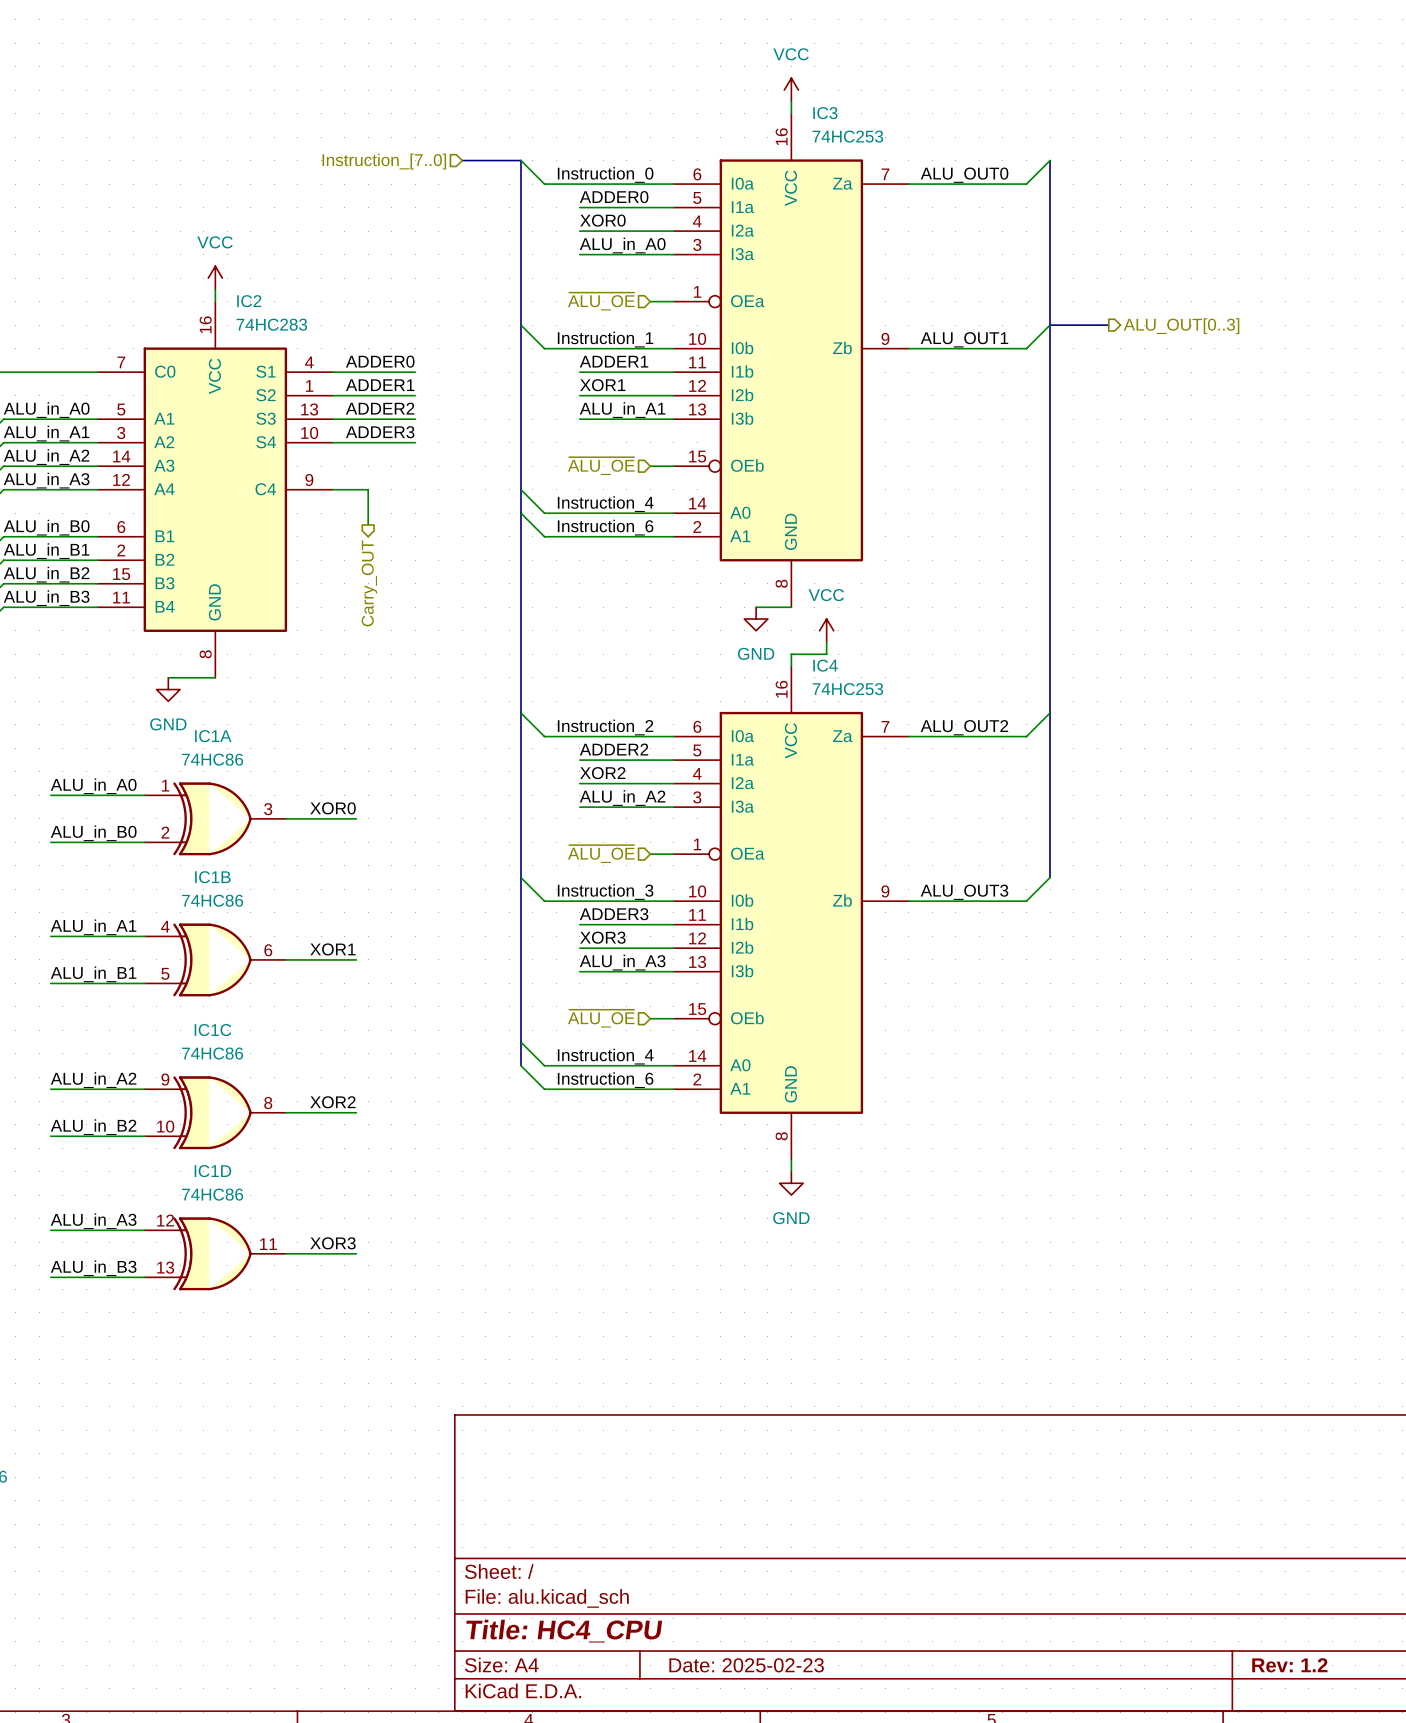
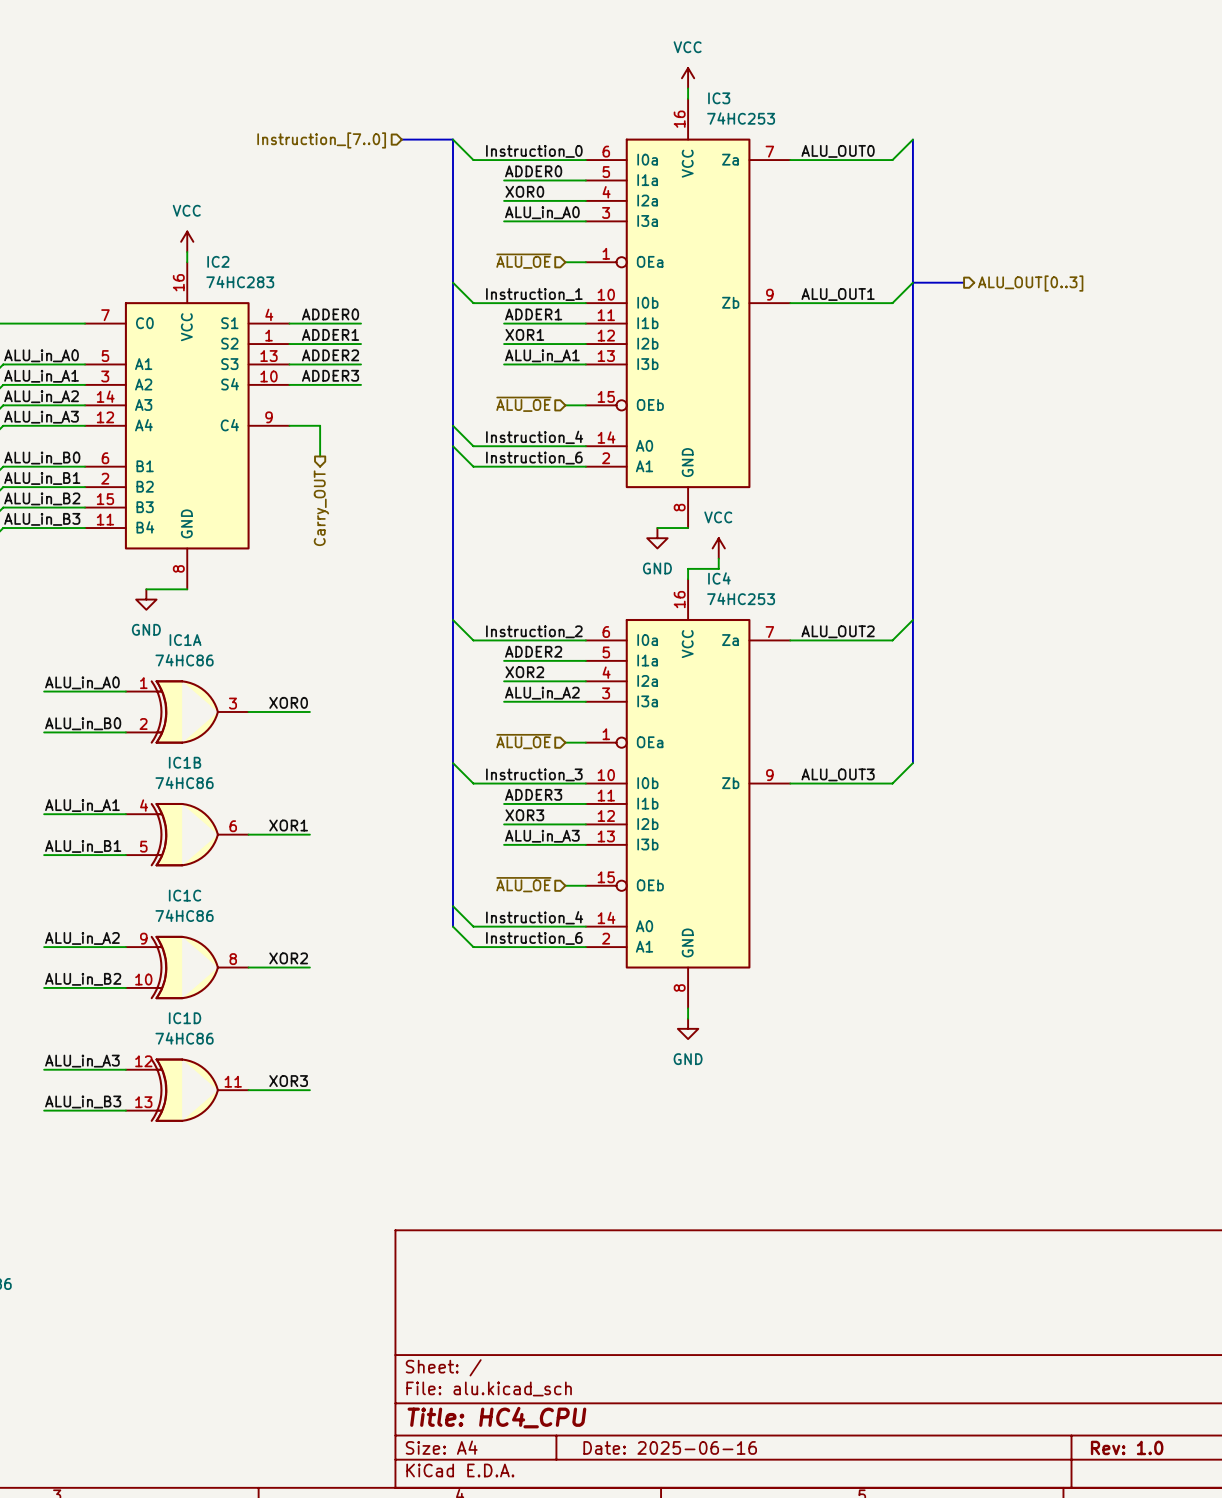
title block: Date: 2025-02-23 (746, 1665) -> Date: 2025-06-16 (670, 1447)
title block: Rev: 1.2 (1289, 1665) -> Rev: 1.0 (1127, 1447)

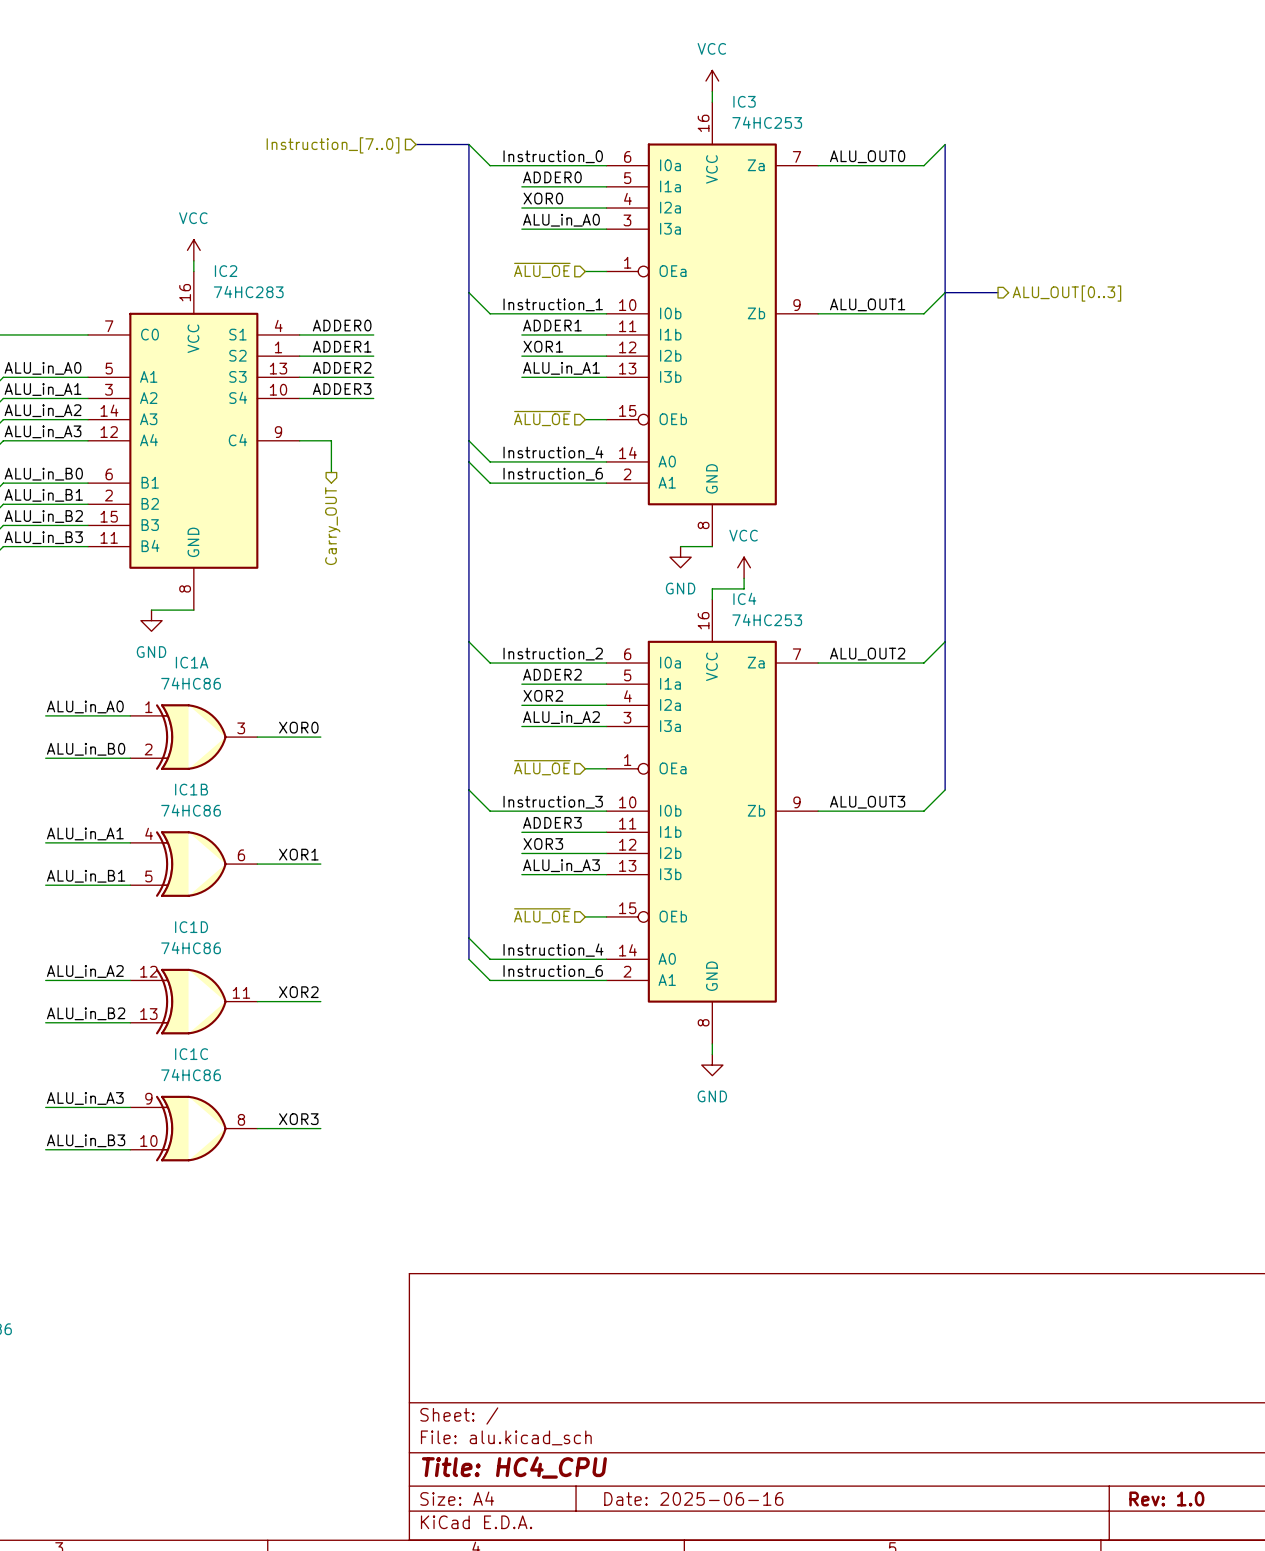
IC1C position: (187, 967) -> (193, 1128)
IC1D position: (187, 1090) -> (193, 1001)

